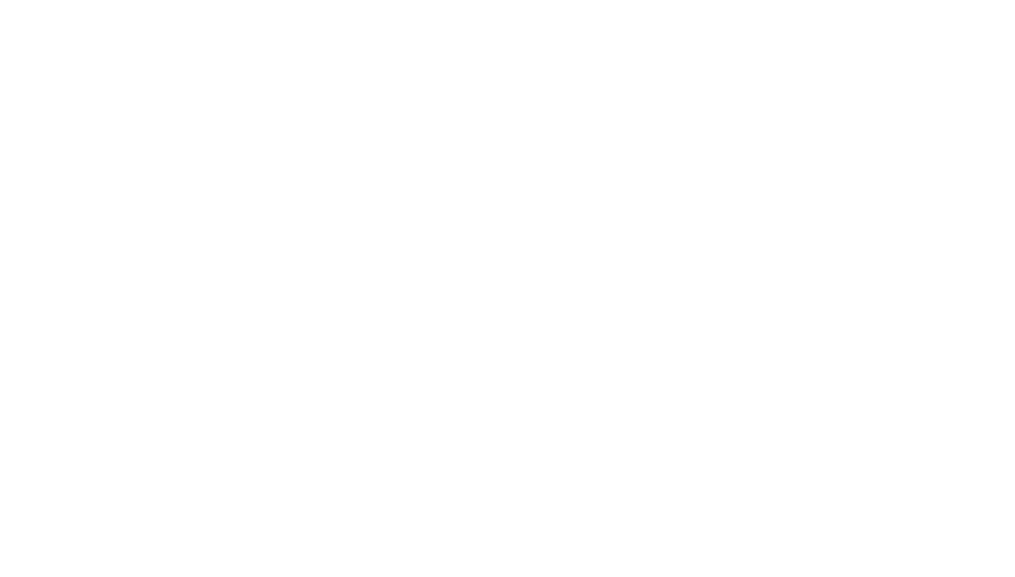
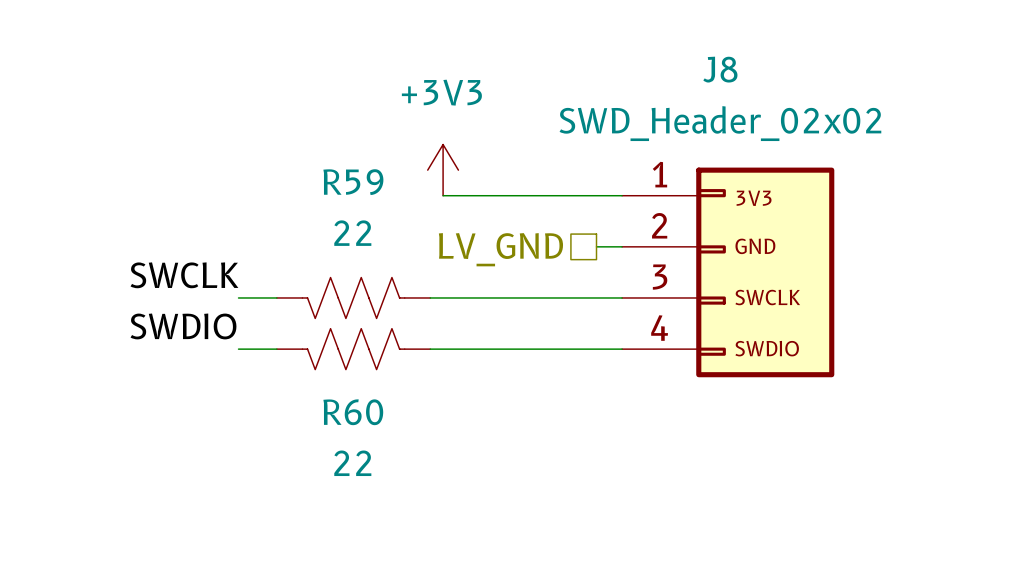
power symbol: none -> +3V3 (443, 170)
wire: none -> (443, 195) (622, 195)
wire: none -> (596, 246) (622, 246)
hierarchical label: none -> LV_GND (500, 249)
J8: none -> SWD_Header_02x02 (728, 272)
label: none -> SWCLK (184, 275)
wire: none -> (238, 297) (276, 297)
R59: none -> 22 (353, 297)
wire: none -> (430, 297) (622, 297)
label: none -> SWDIO (183, 326)
wire: none -> (238, 349) (276, 349)
R60: none -> 22 (353, 349)
wire: none -> (430, 349) (622, 349)

